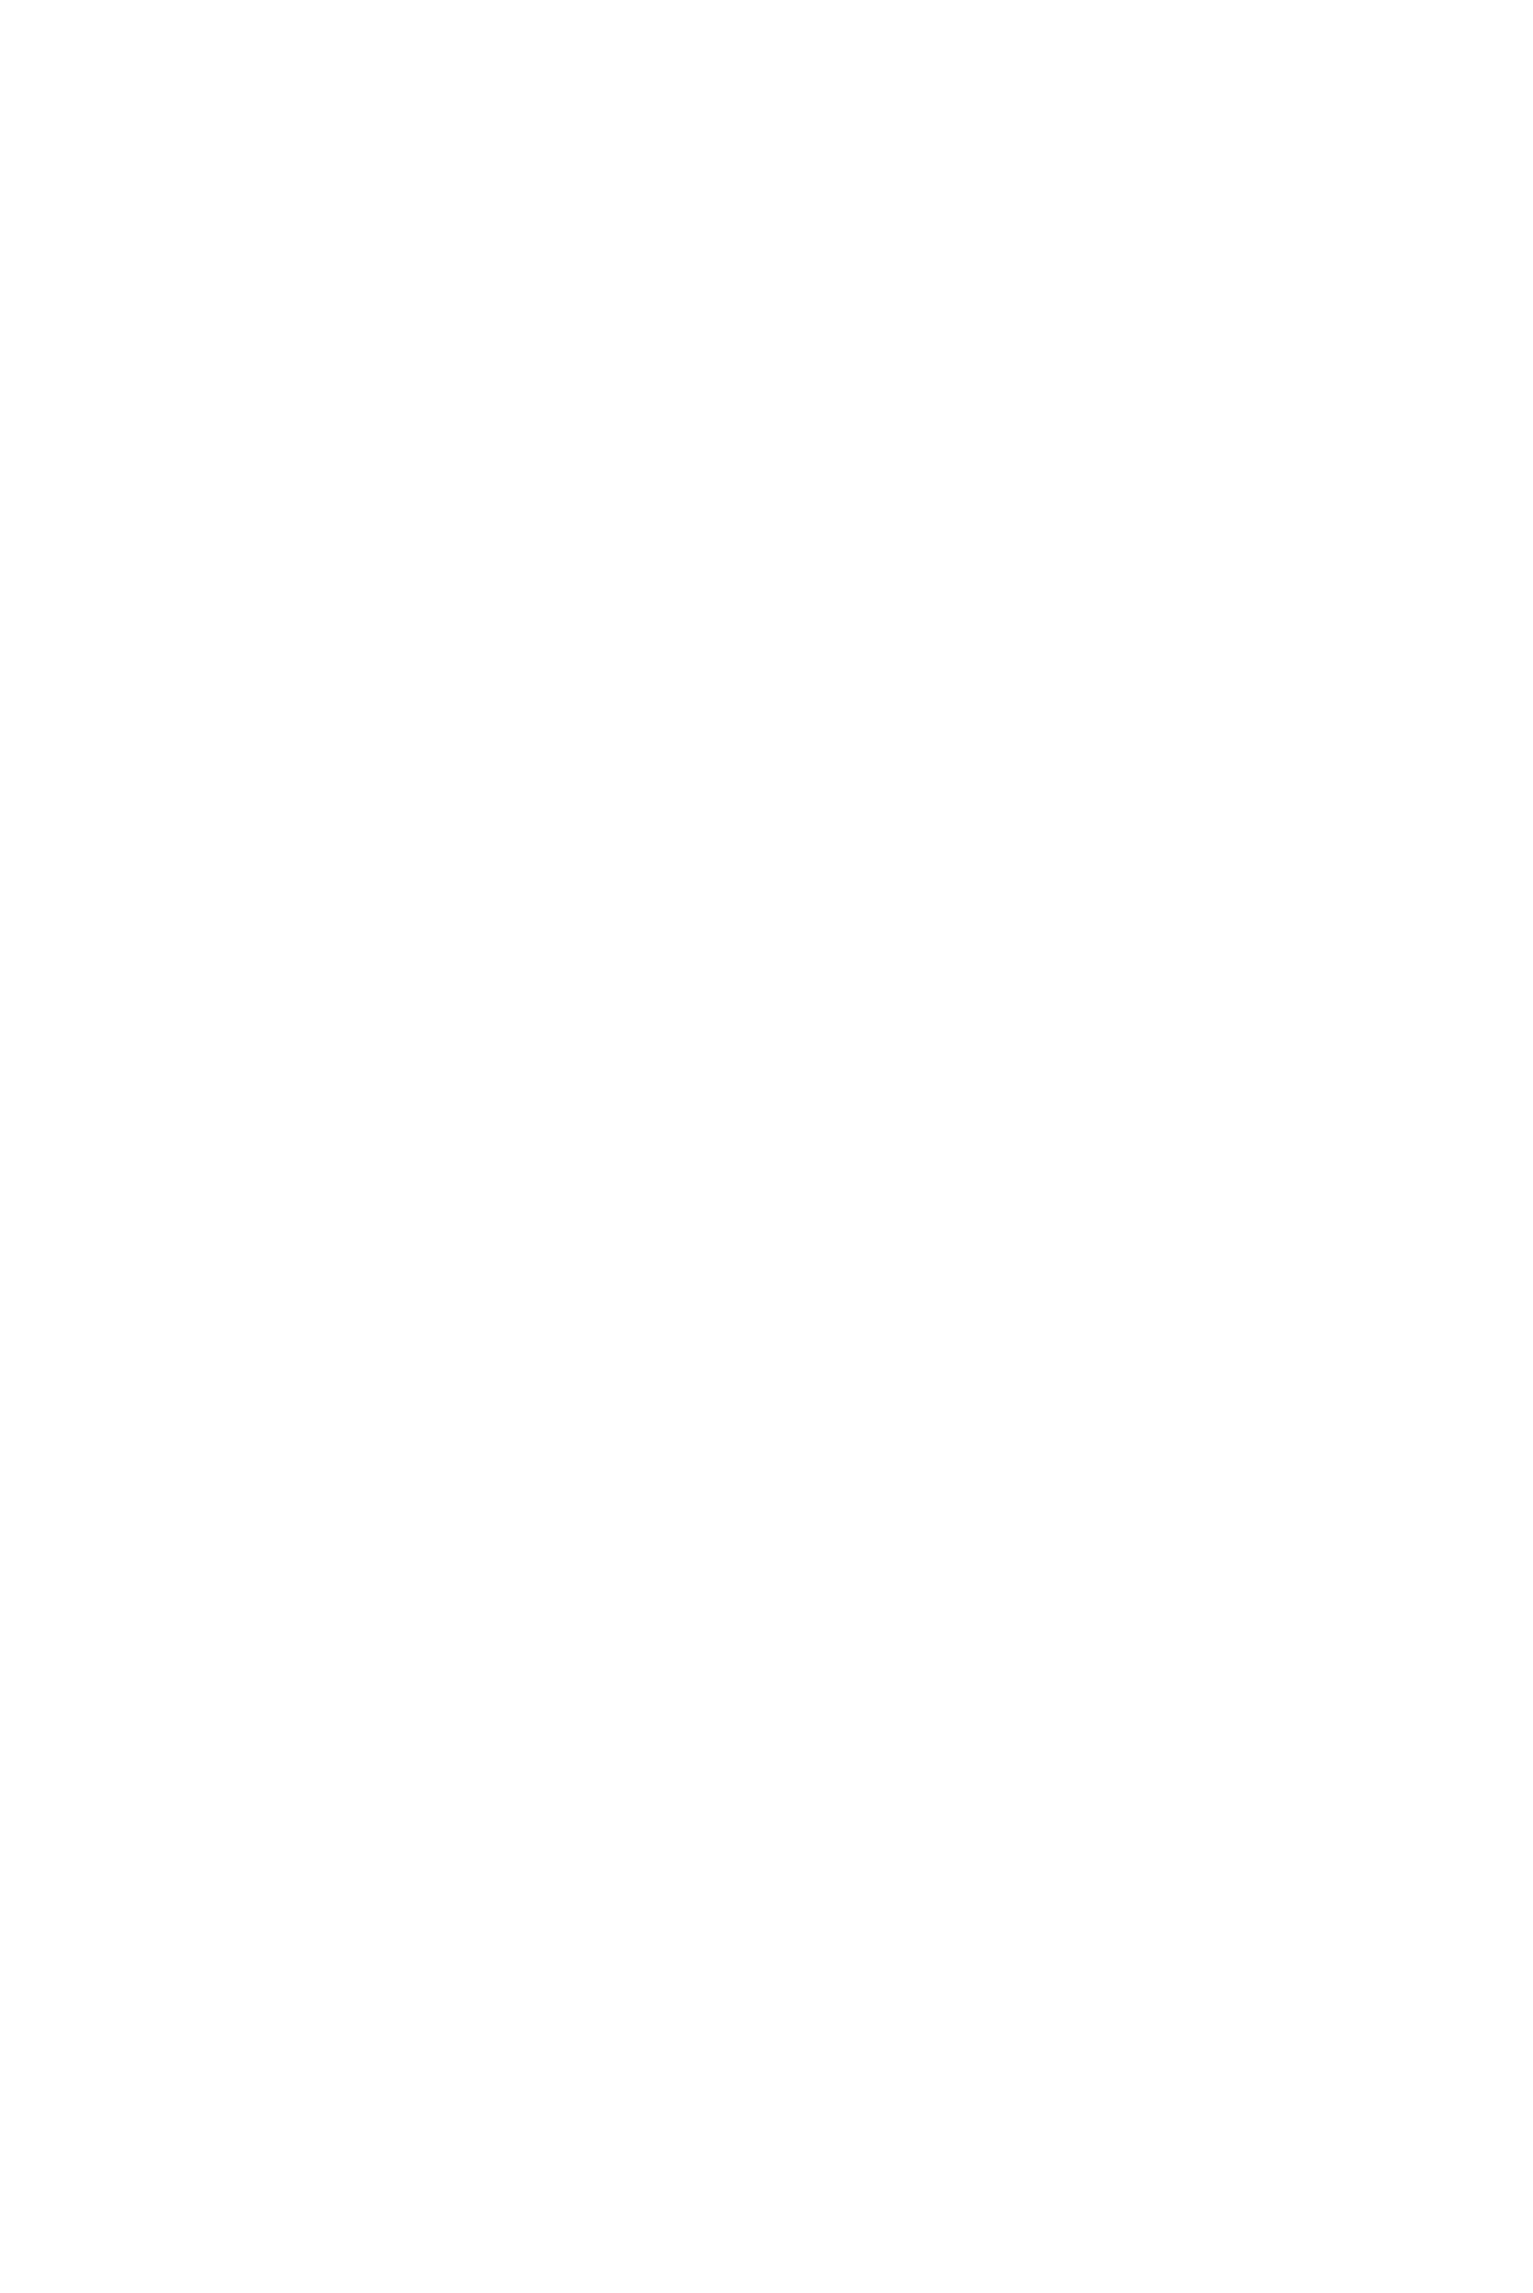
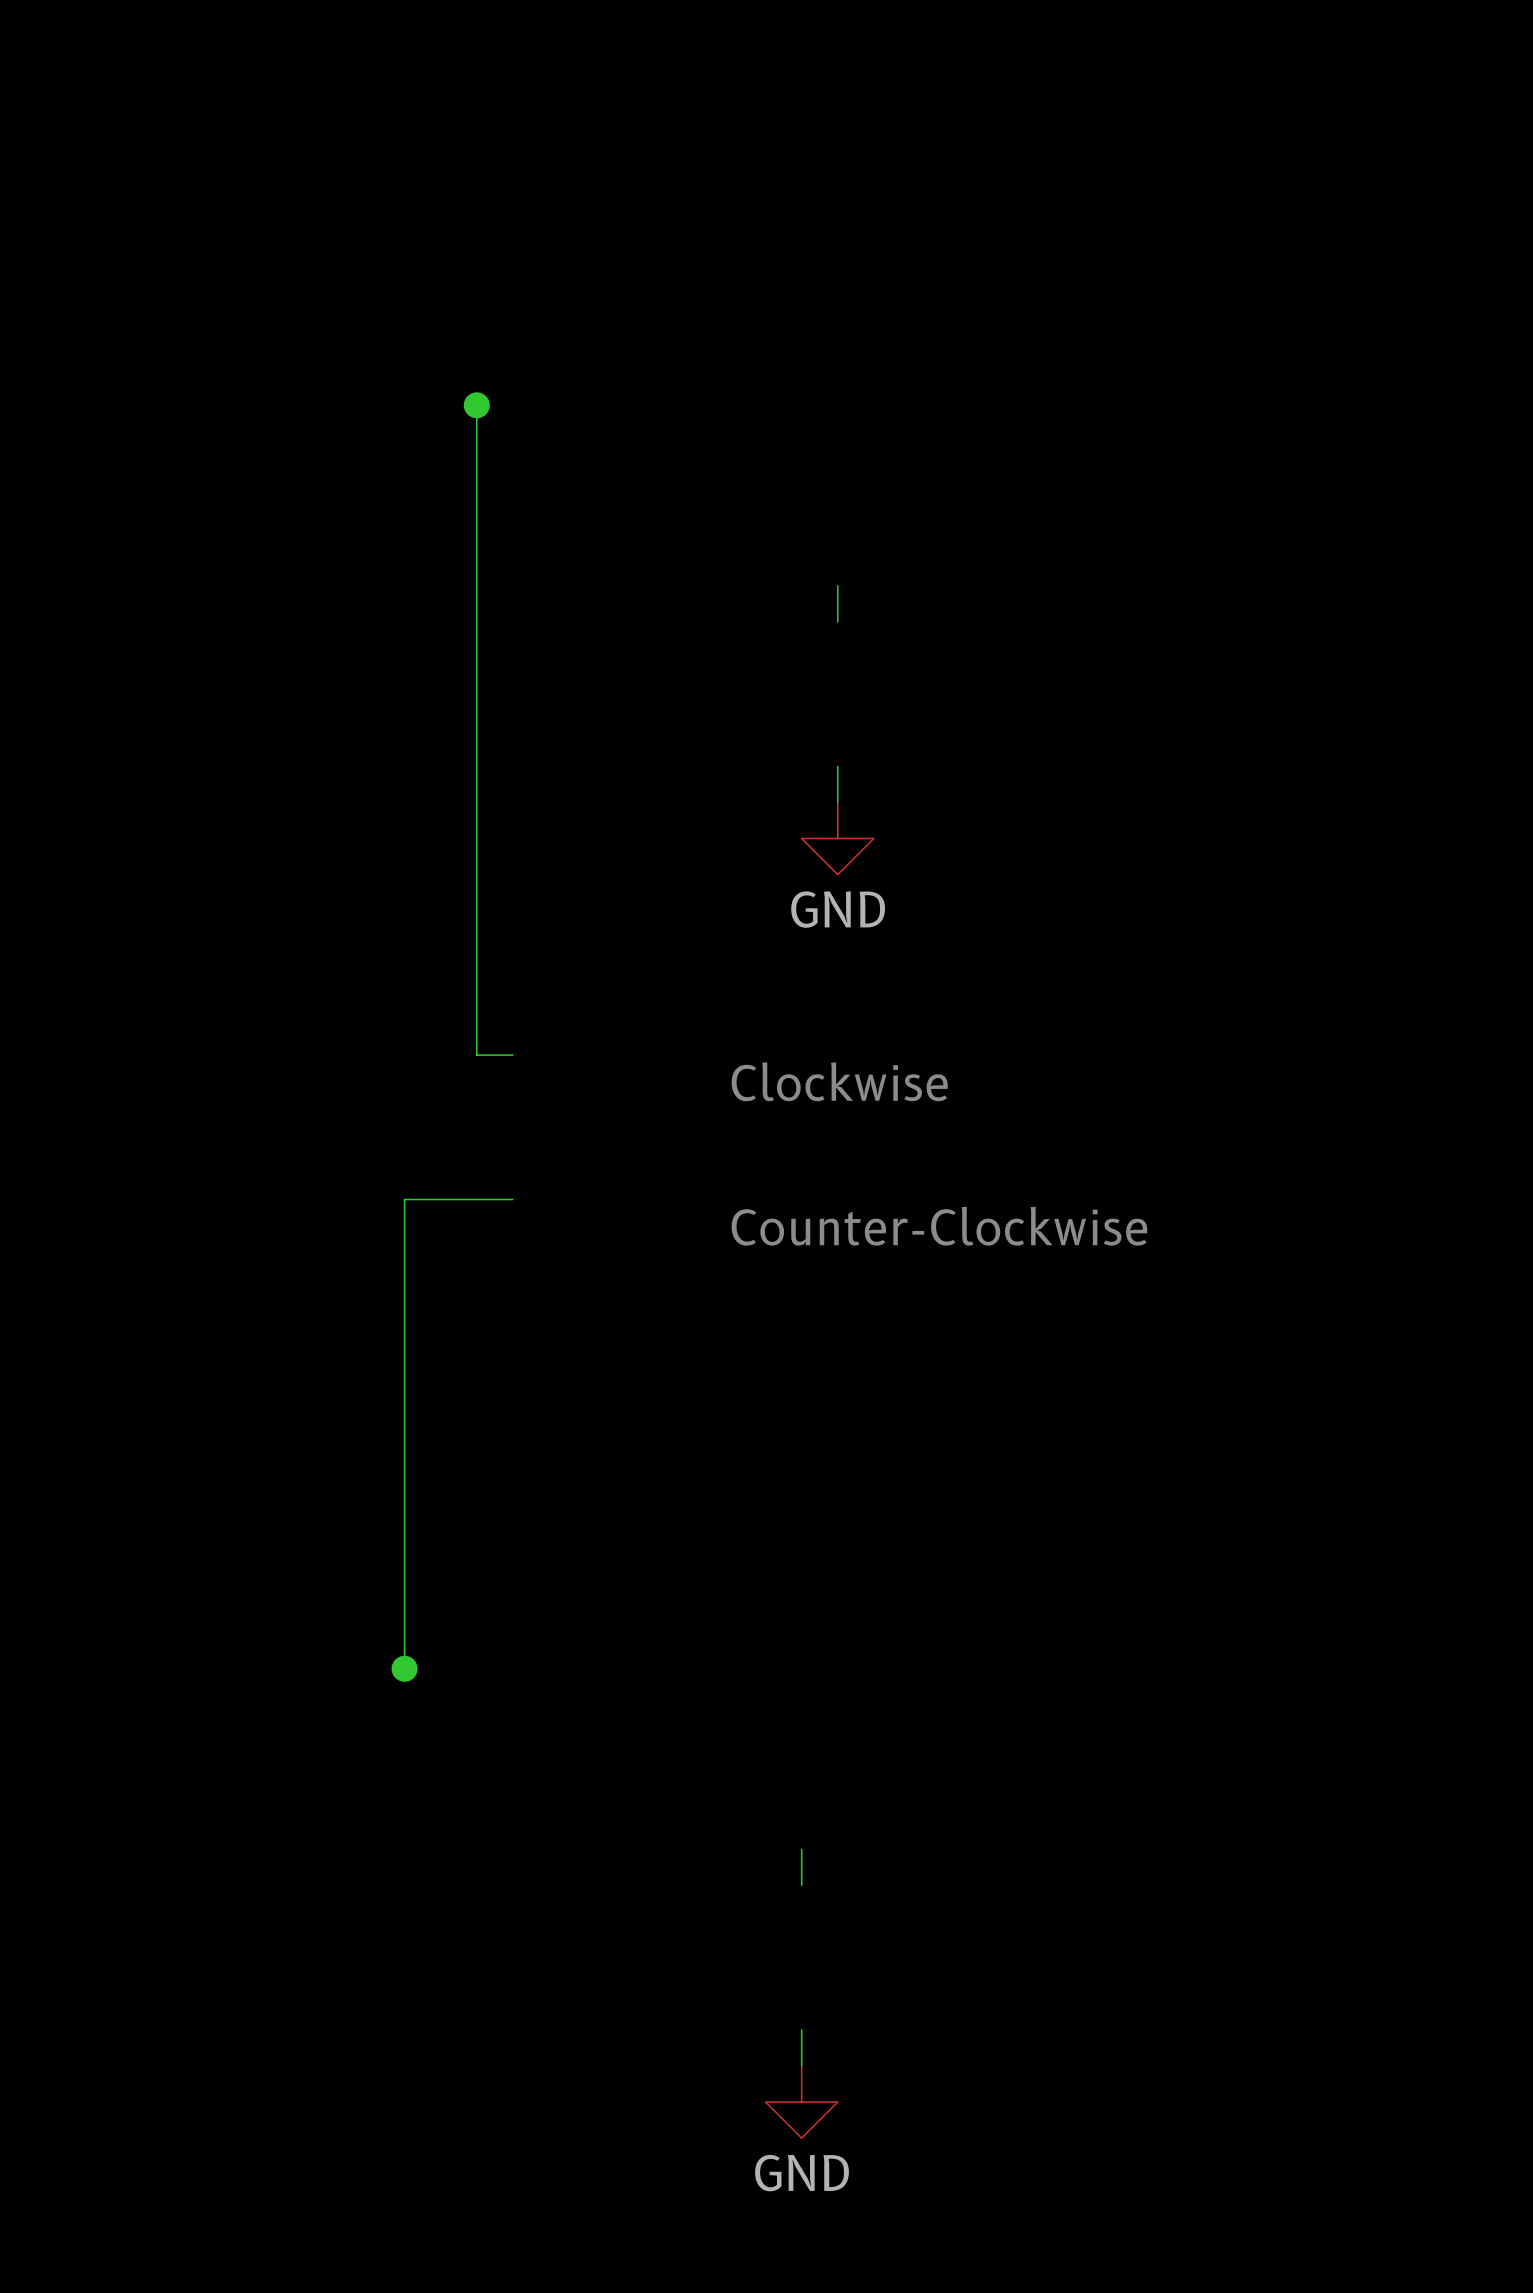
wire: none -> (476, 405) (476, 1055) (512, 1055)
junction: none -> (476, 405)
wire: none -> (837, 585) (837, 621)
wire: none -> (837, 766) (837, 802)
power symbol: none -> GND (837, 838)
text: none -> Clockwise (839, 1081)
wire: none -> (512, 1199) (404, 1199) (404, 1668)
text: none -> Counter-Clockwise (939, 1226)
junction: none -> (404, 1668)
wire: none -> (801, 1849) (801, 1885)
wire: none -> (801, 2029) (801, 2065)
power symbol: none -> GND (801, 2102)

